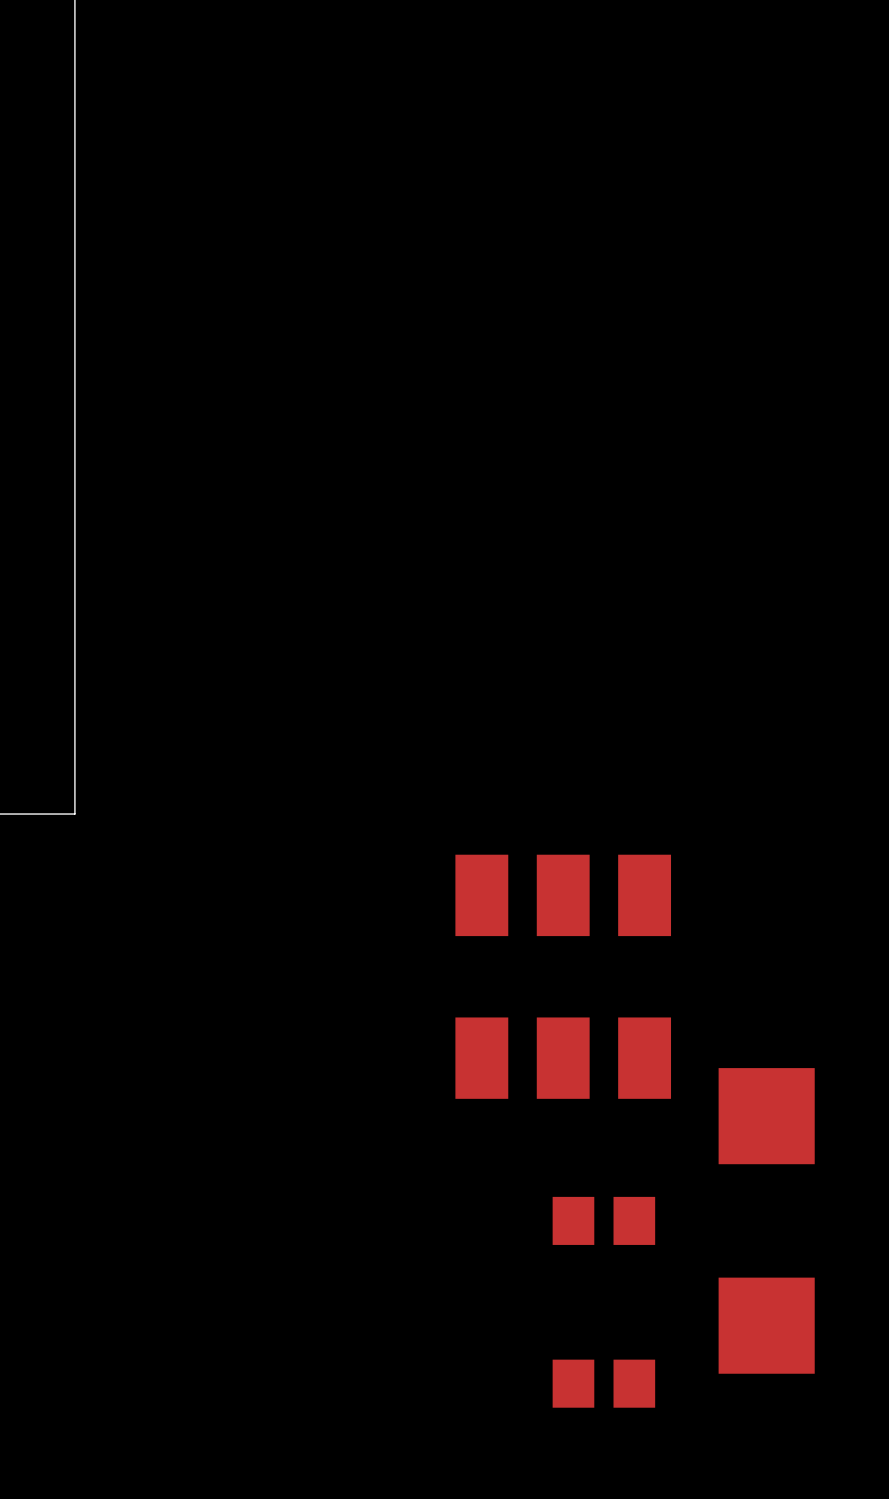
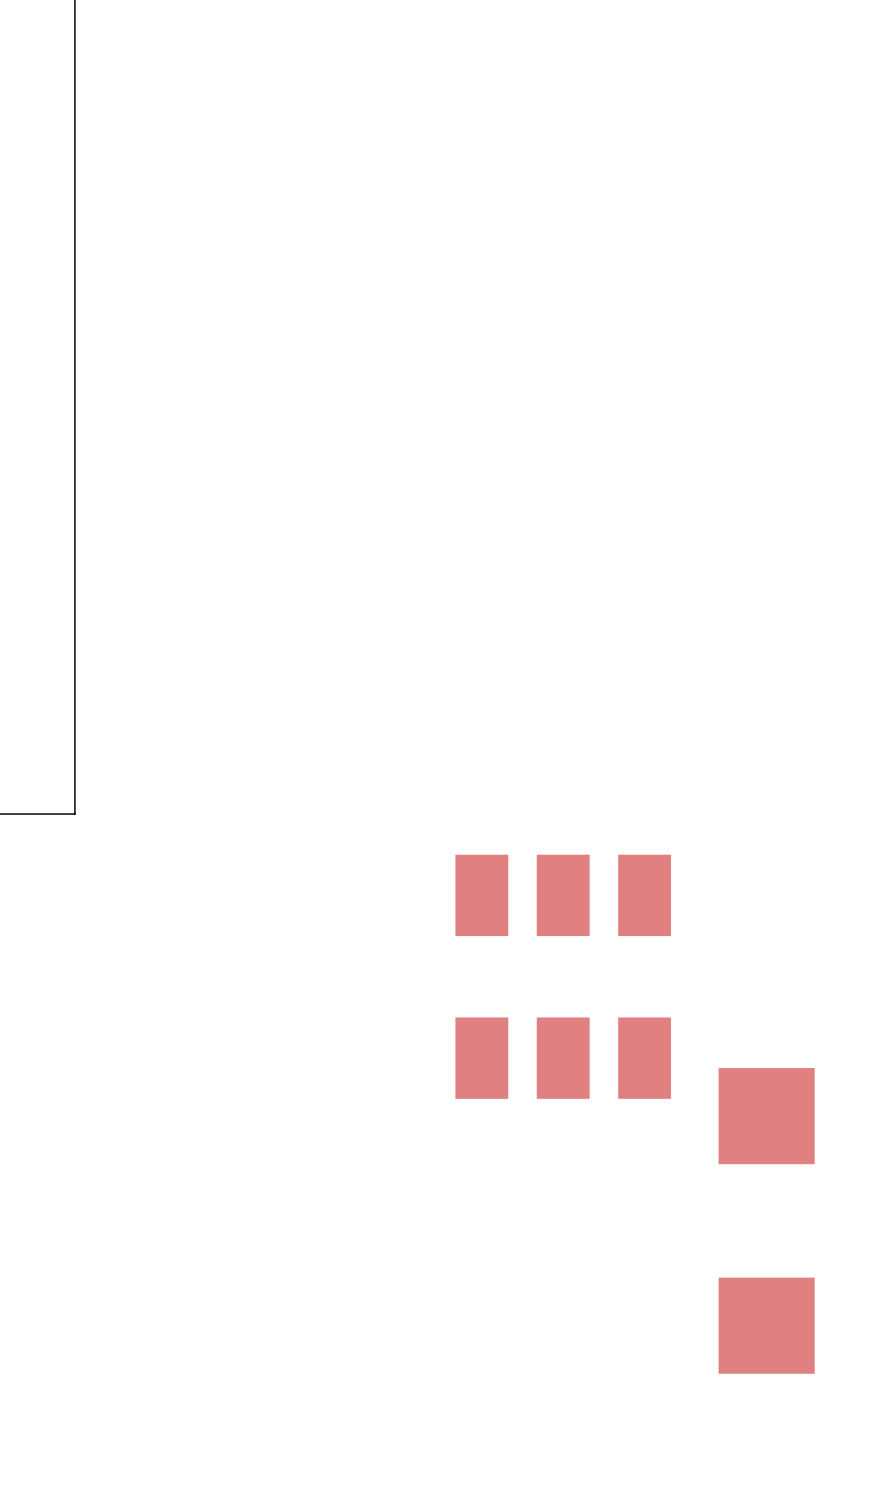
part: (603, 1220) -> none
part: (603, 1383) -> none

